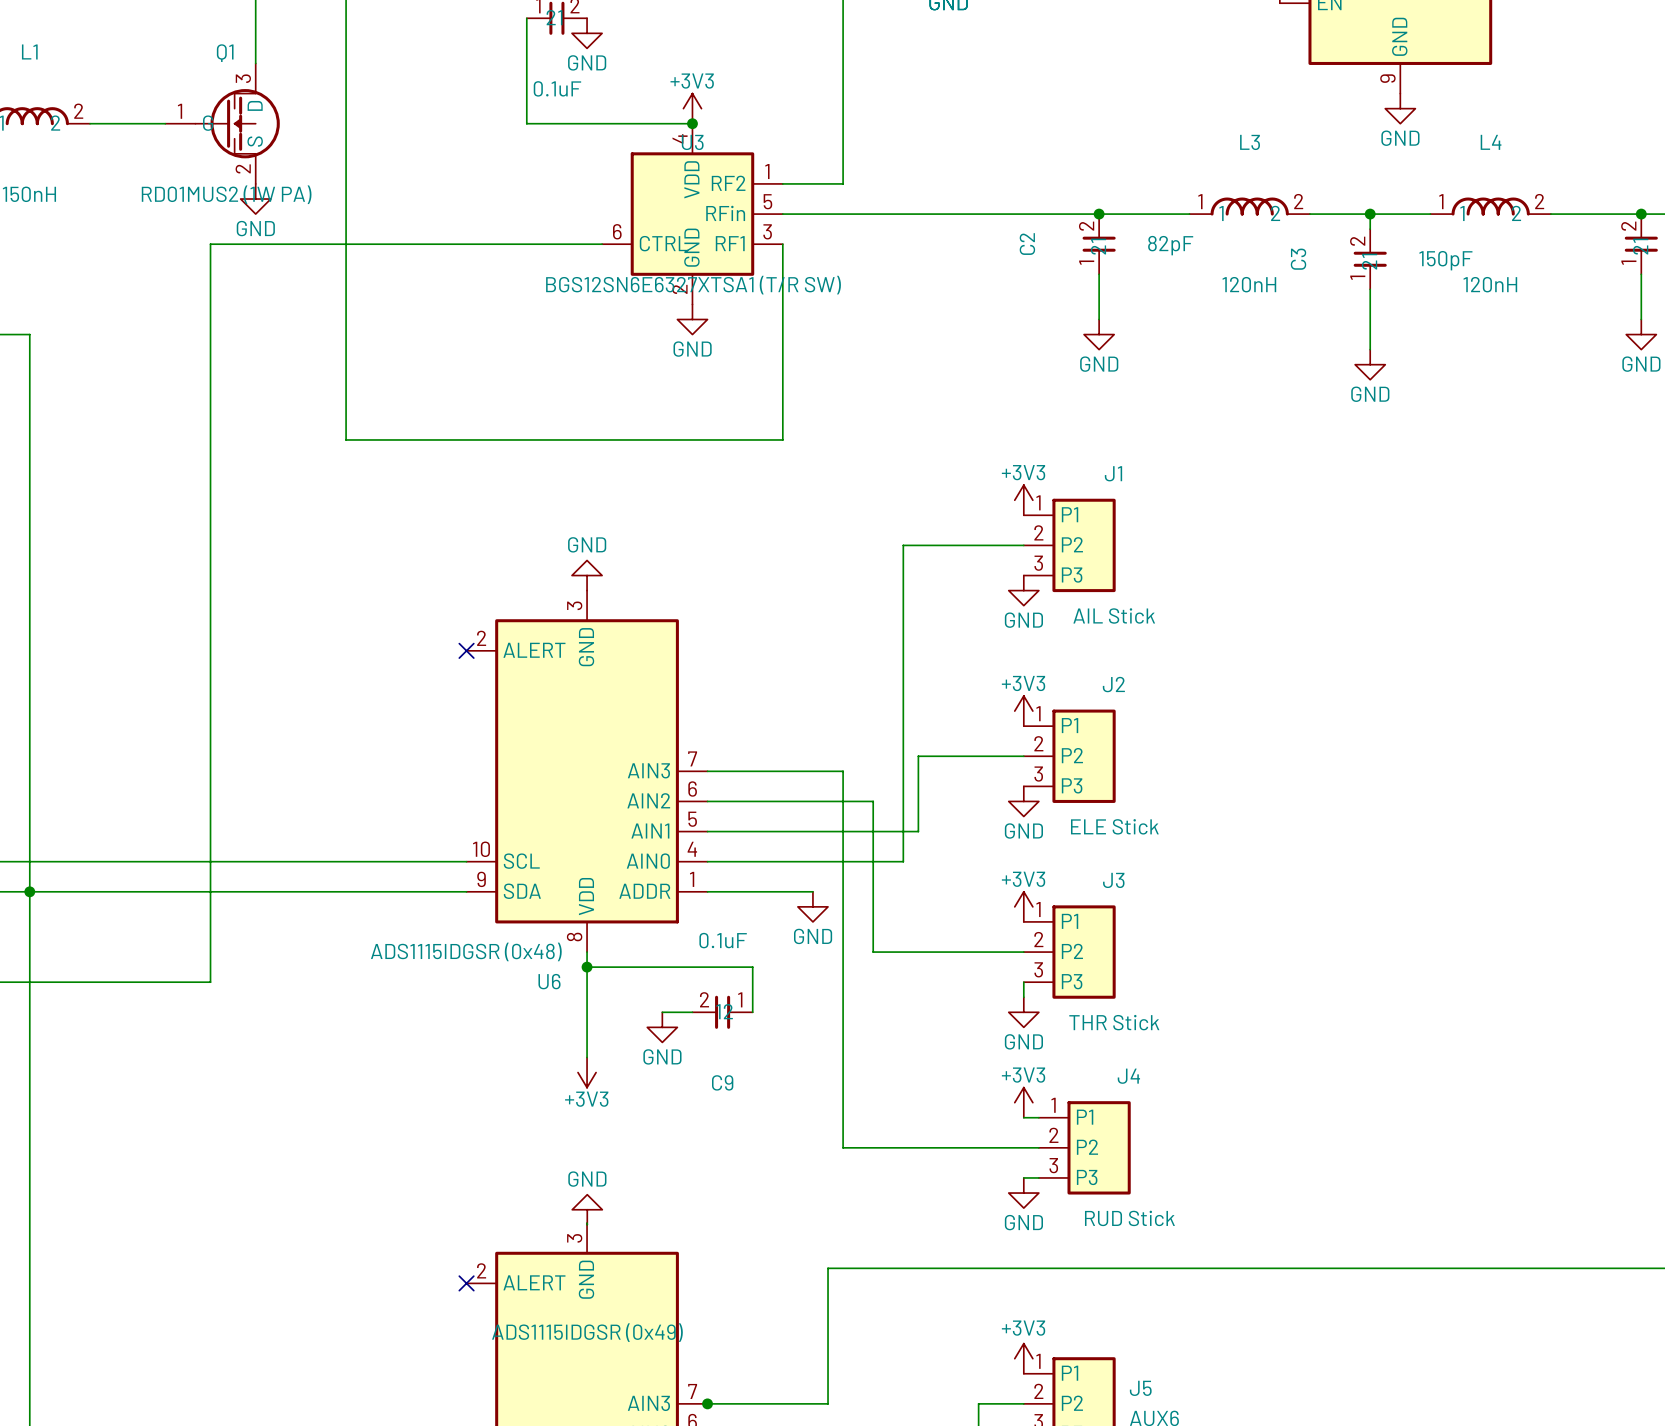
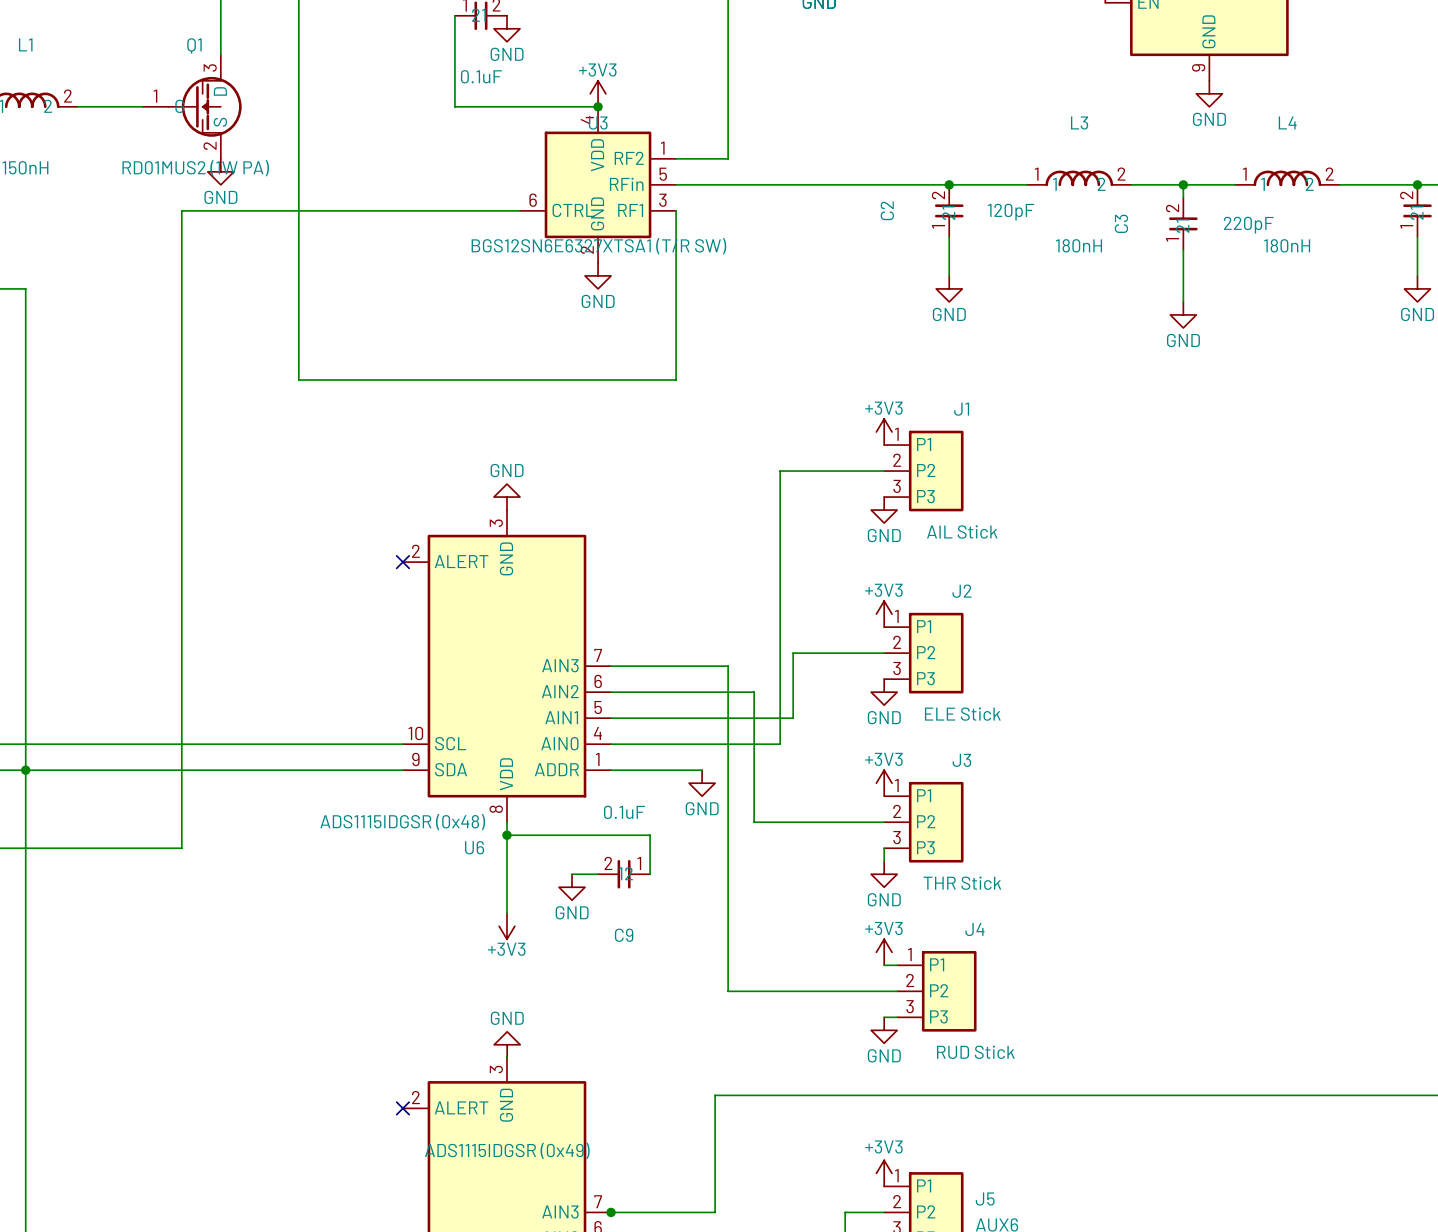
C2 value: 82pF (1170, 245) -> 120pF (1011, 212)
C3 value: 150pF (1445, 260) -> 220pF (1248, 225)
L3 value: 120nH (1249, 284) -> 180nH (1078, 245)
L4 value: 120nH (1490, 284) -> 180nH (1287, 245)

